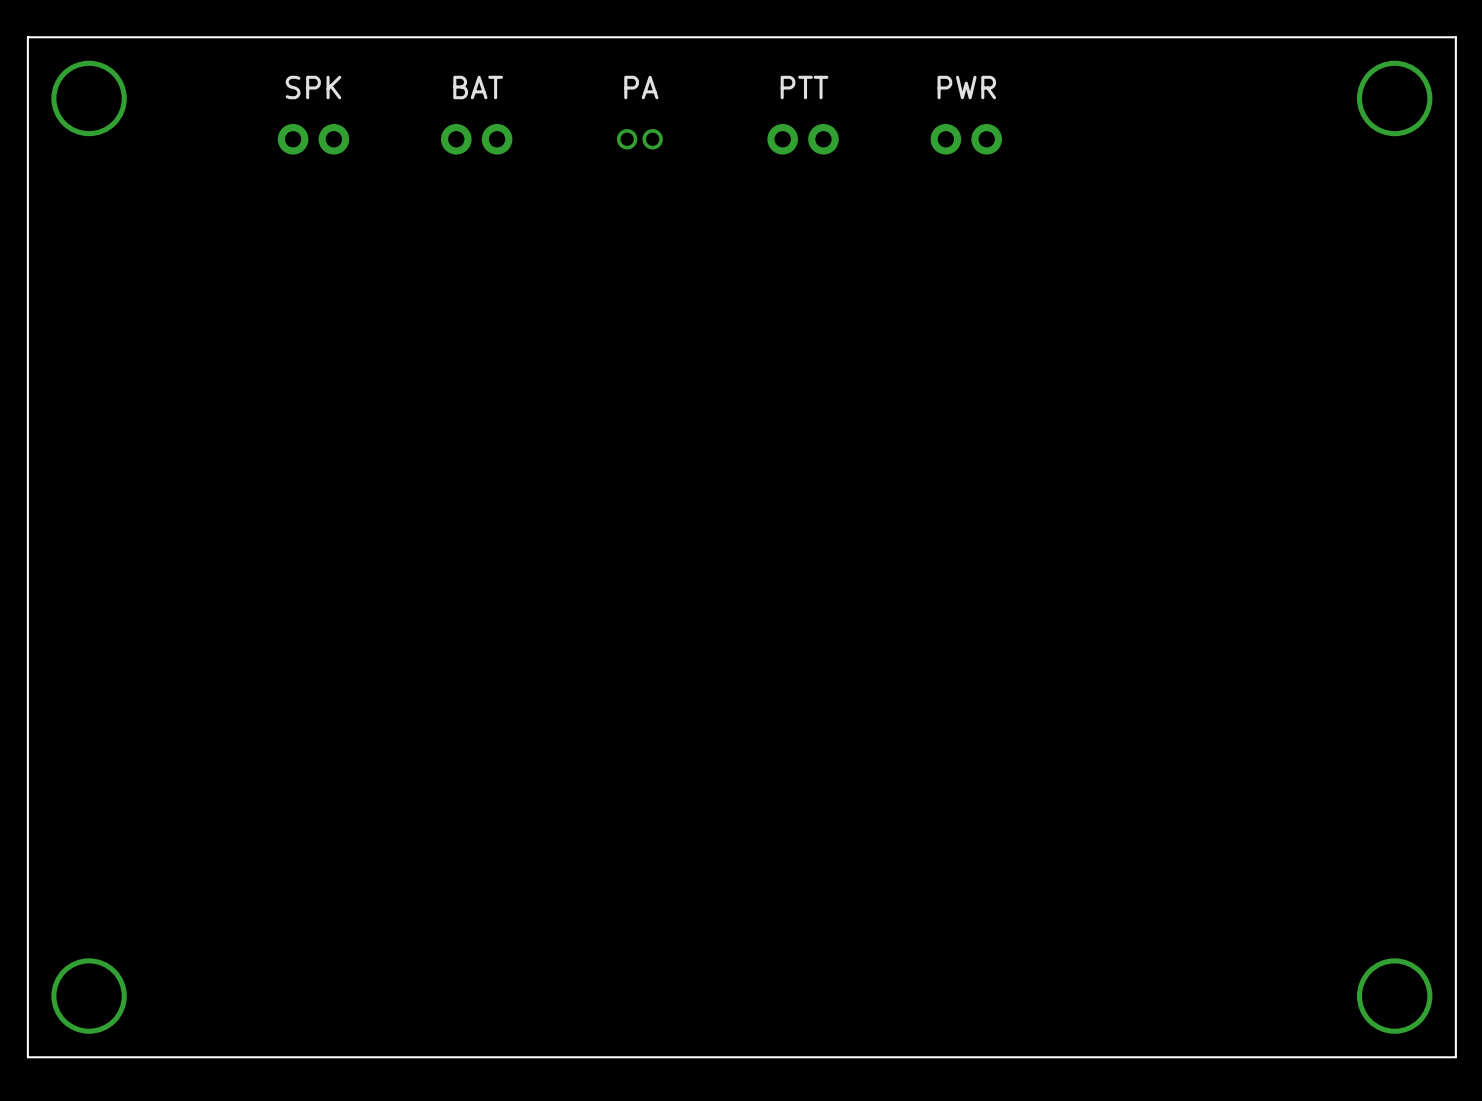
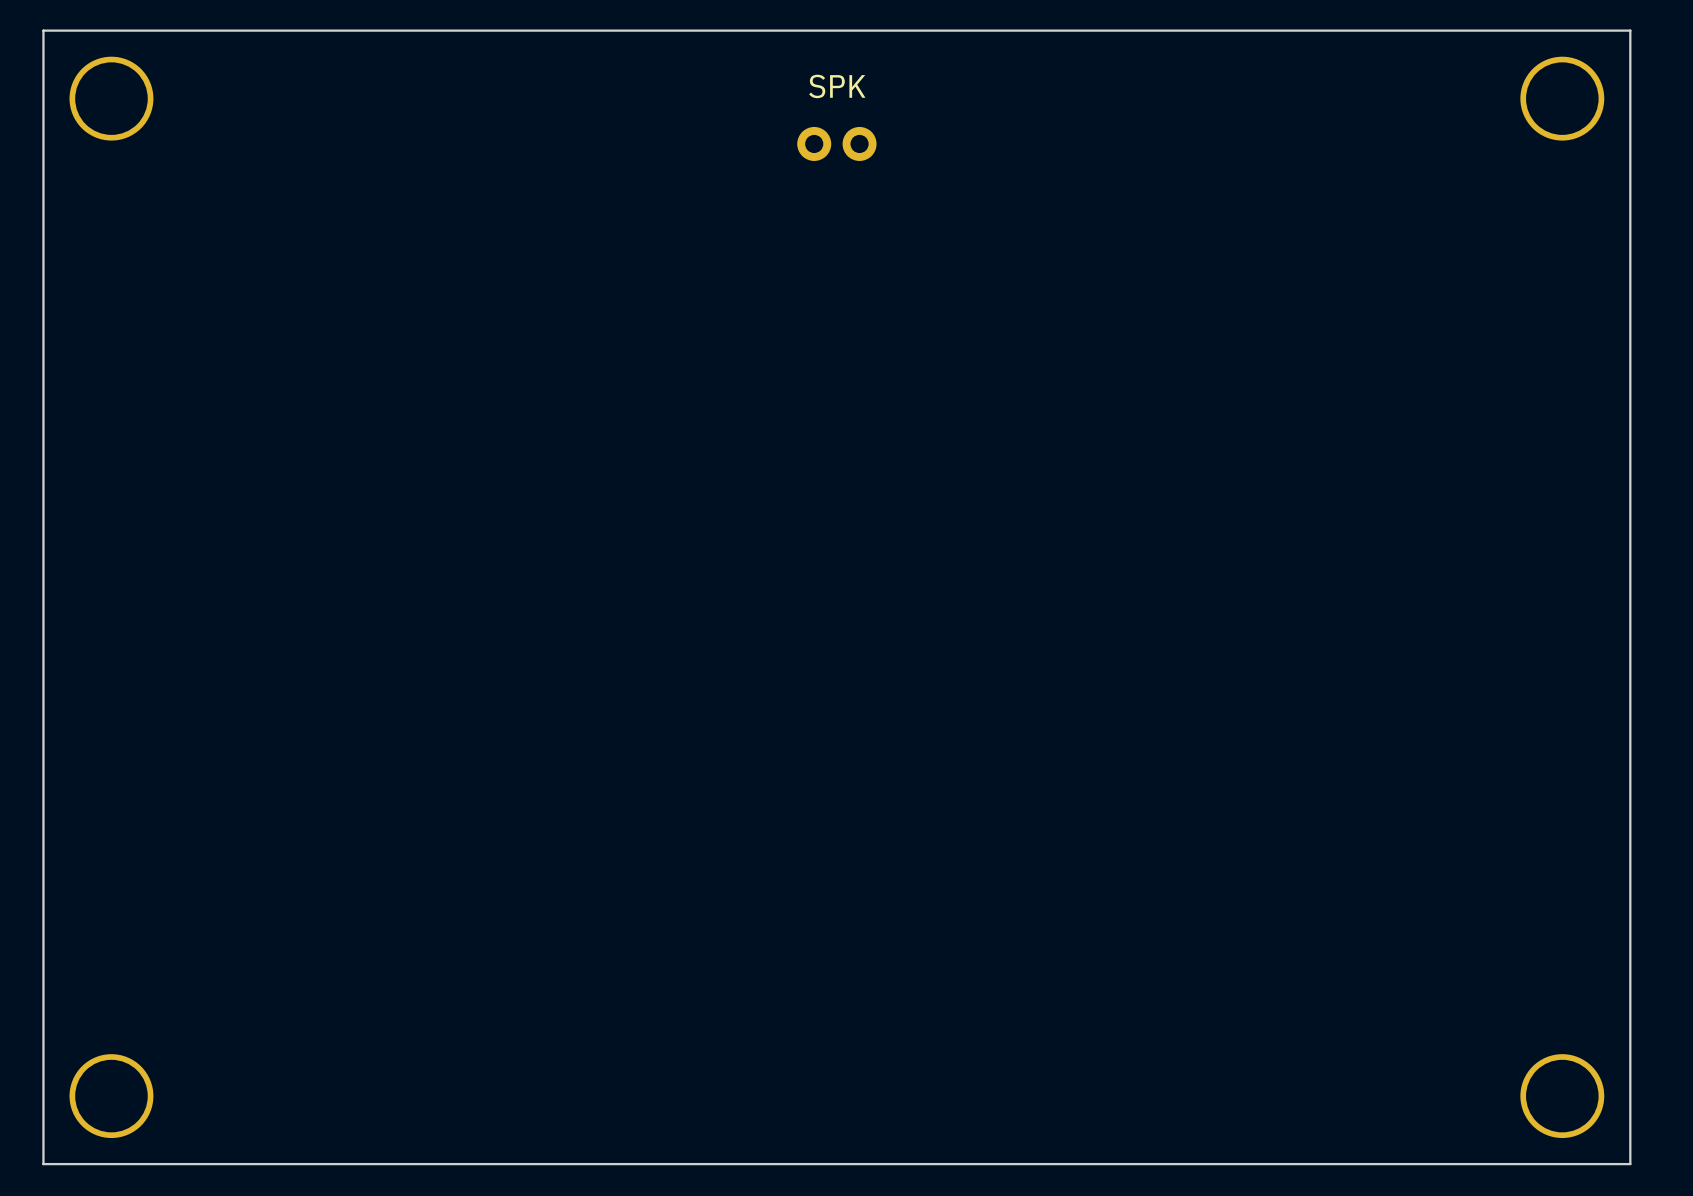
SPK position: (313, 139) -> (836, 143)
BAT: (476, 139) -> none
PA: (639, 139) -> none
PTT: (803, 139) -> none
PWR: (966, 139) -> none

